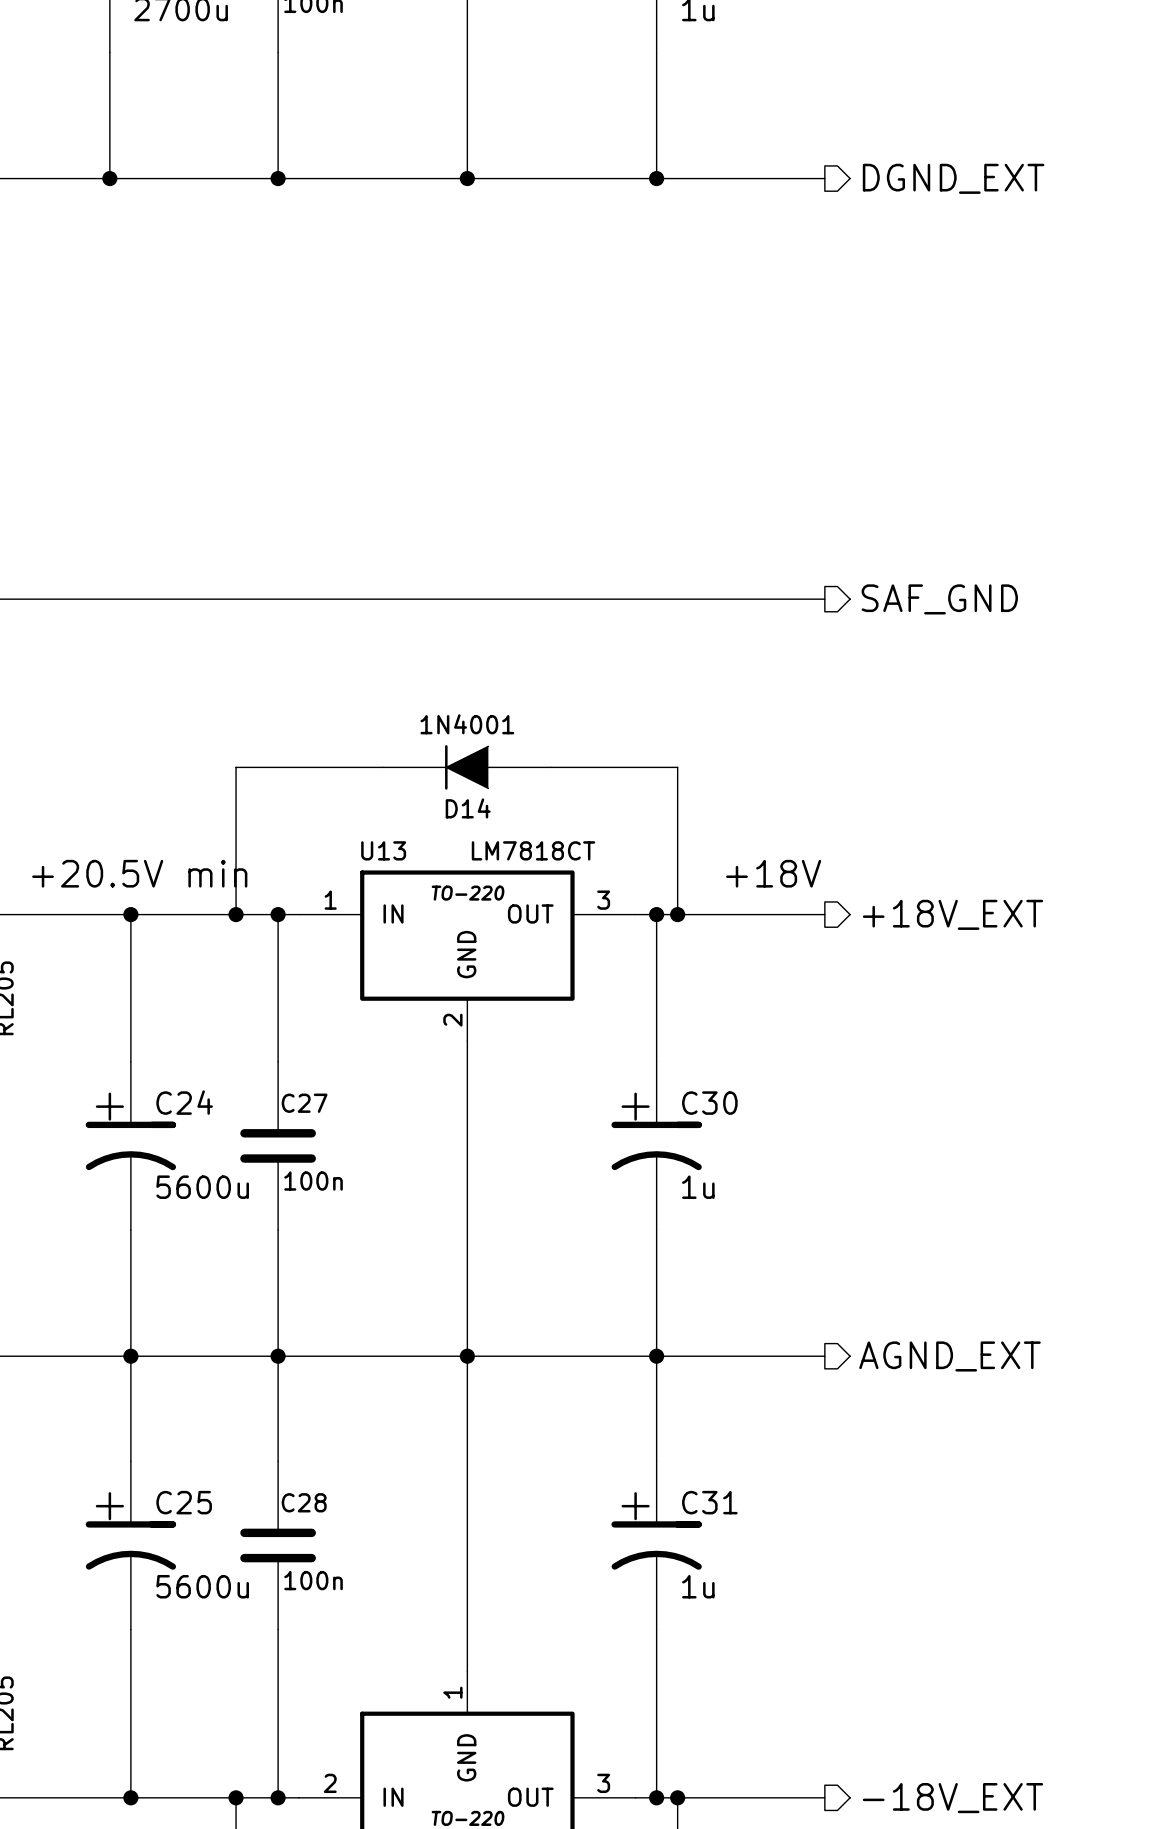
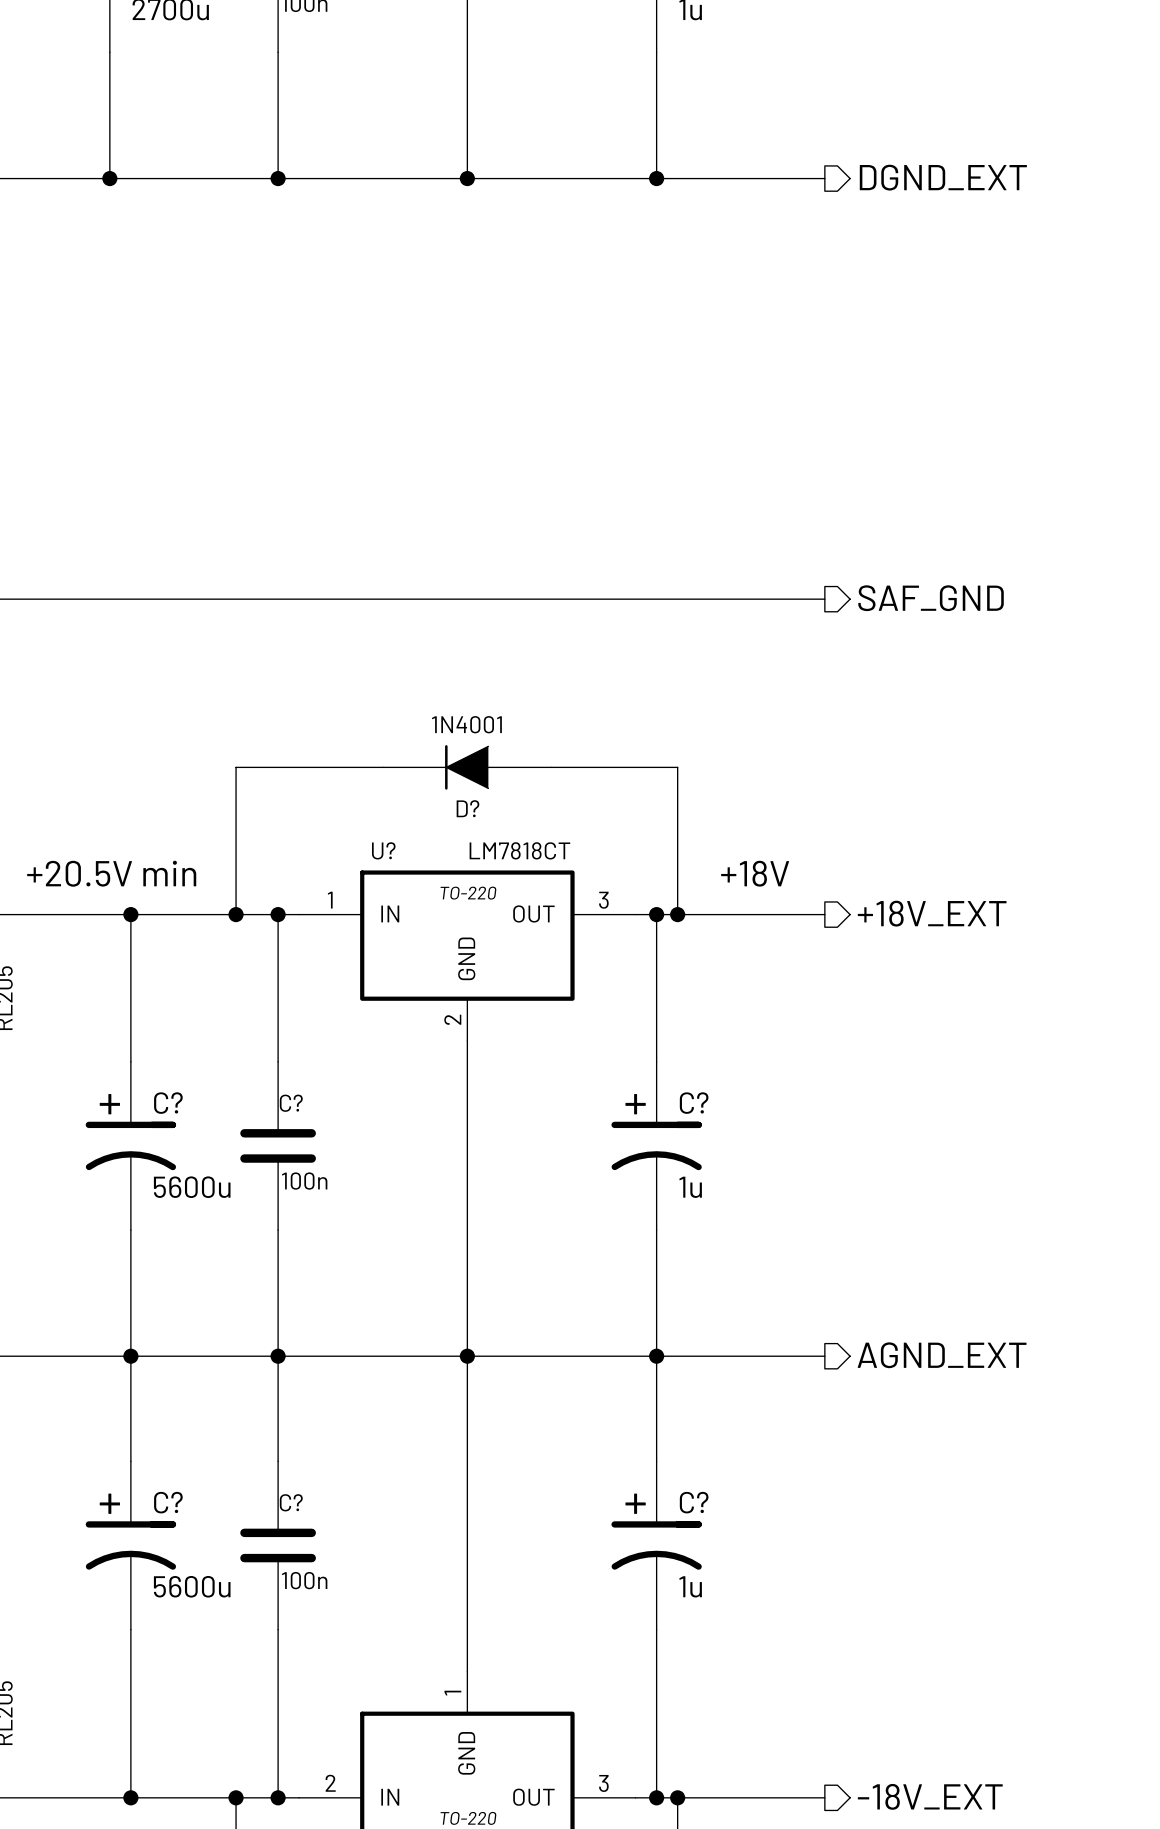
D14 name: D14 (468, 808) -> D? (467, 808)
U13 name: U13 (383, 850) -> U? (383, 850)
C24 name: C24 (184, 1102) -> C? (168, 1103)
C27 name: C27 (304, 1103) -> C? (291, 1103)
C30 name: C30 (709, 1103) -> C? (694, 1103)
C25 name: C25 (184, 1502) -> C? (168, 1502)
C28 name: C28 (304, 1502) -> C? (291, 1502)
C31 name: C31 (709, 1502) -> C? (694, 1502)

